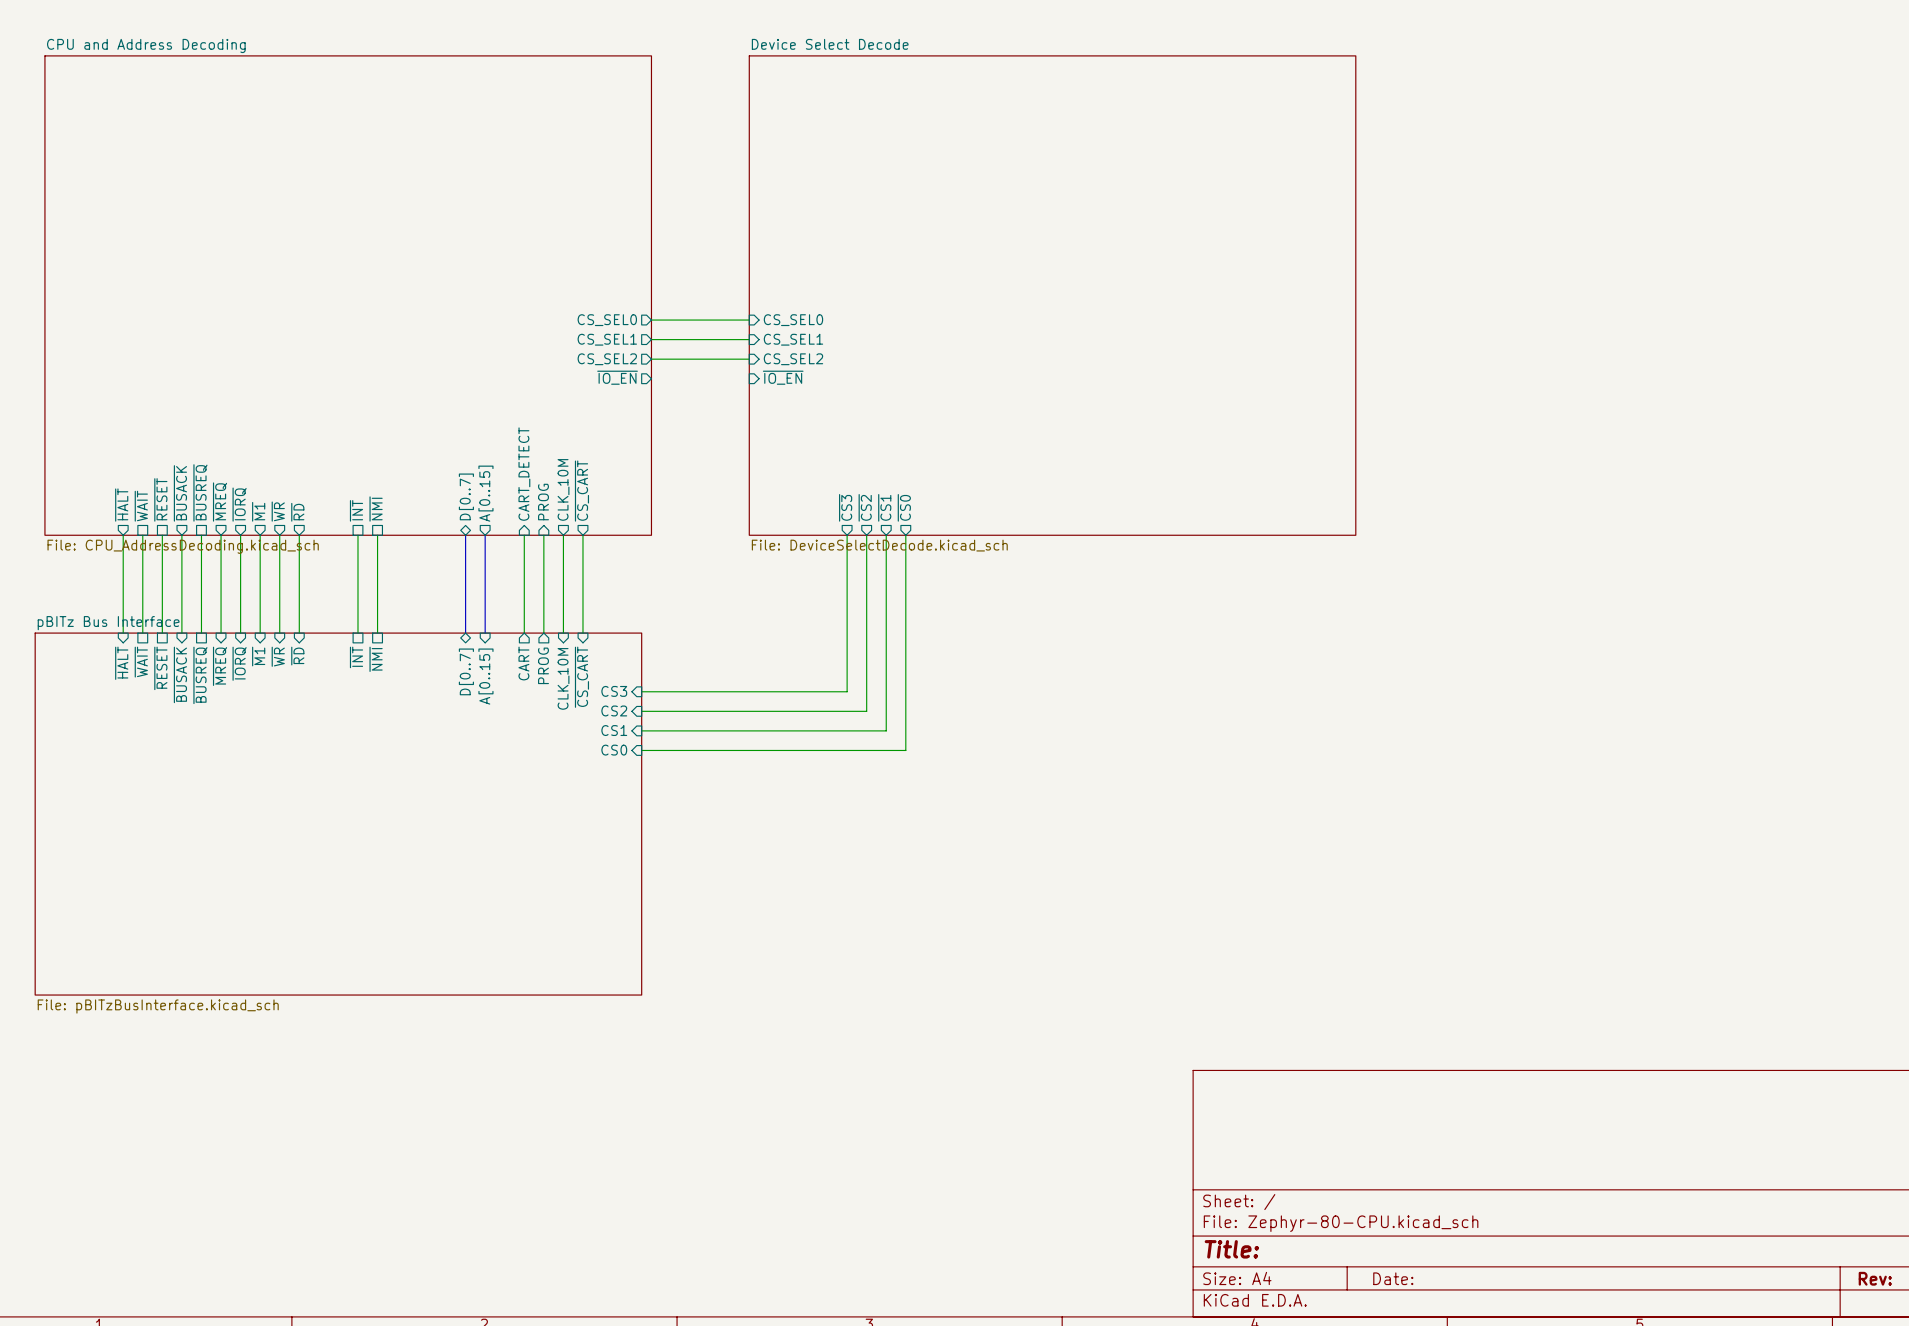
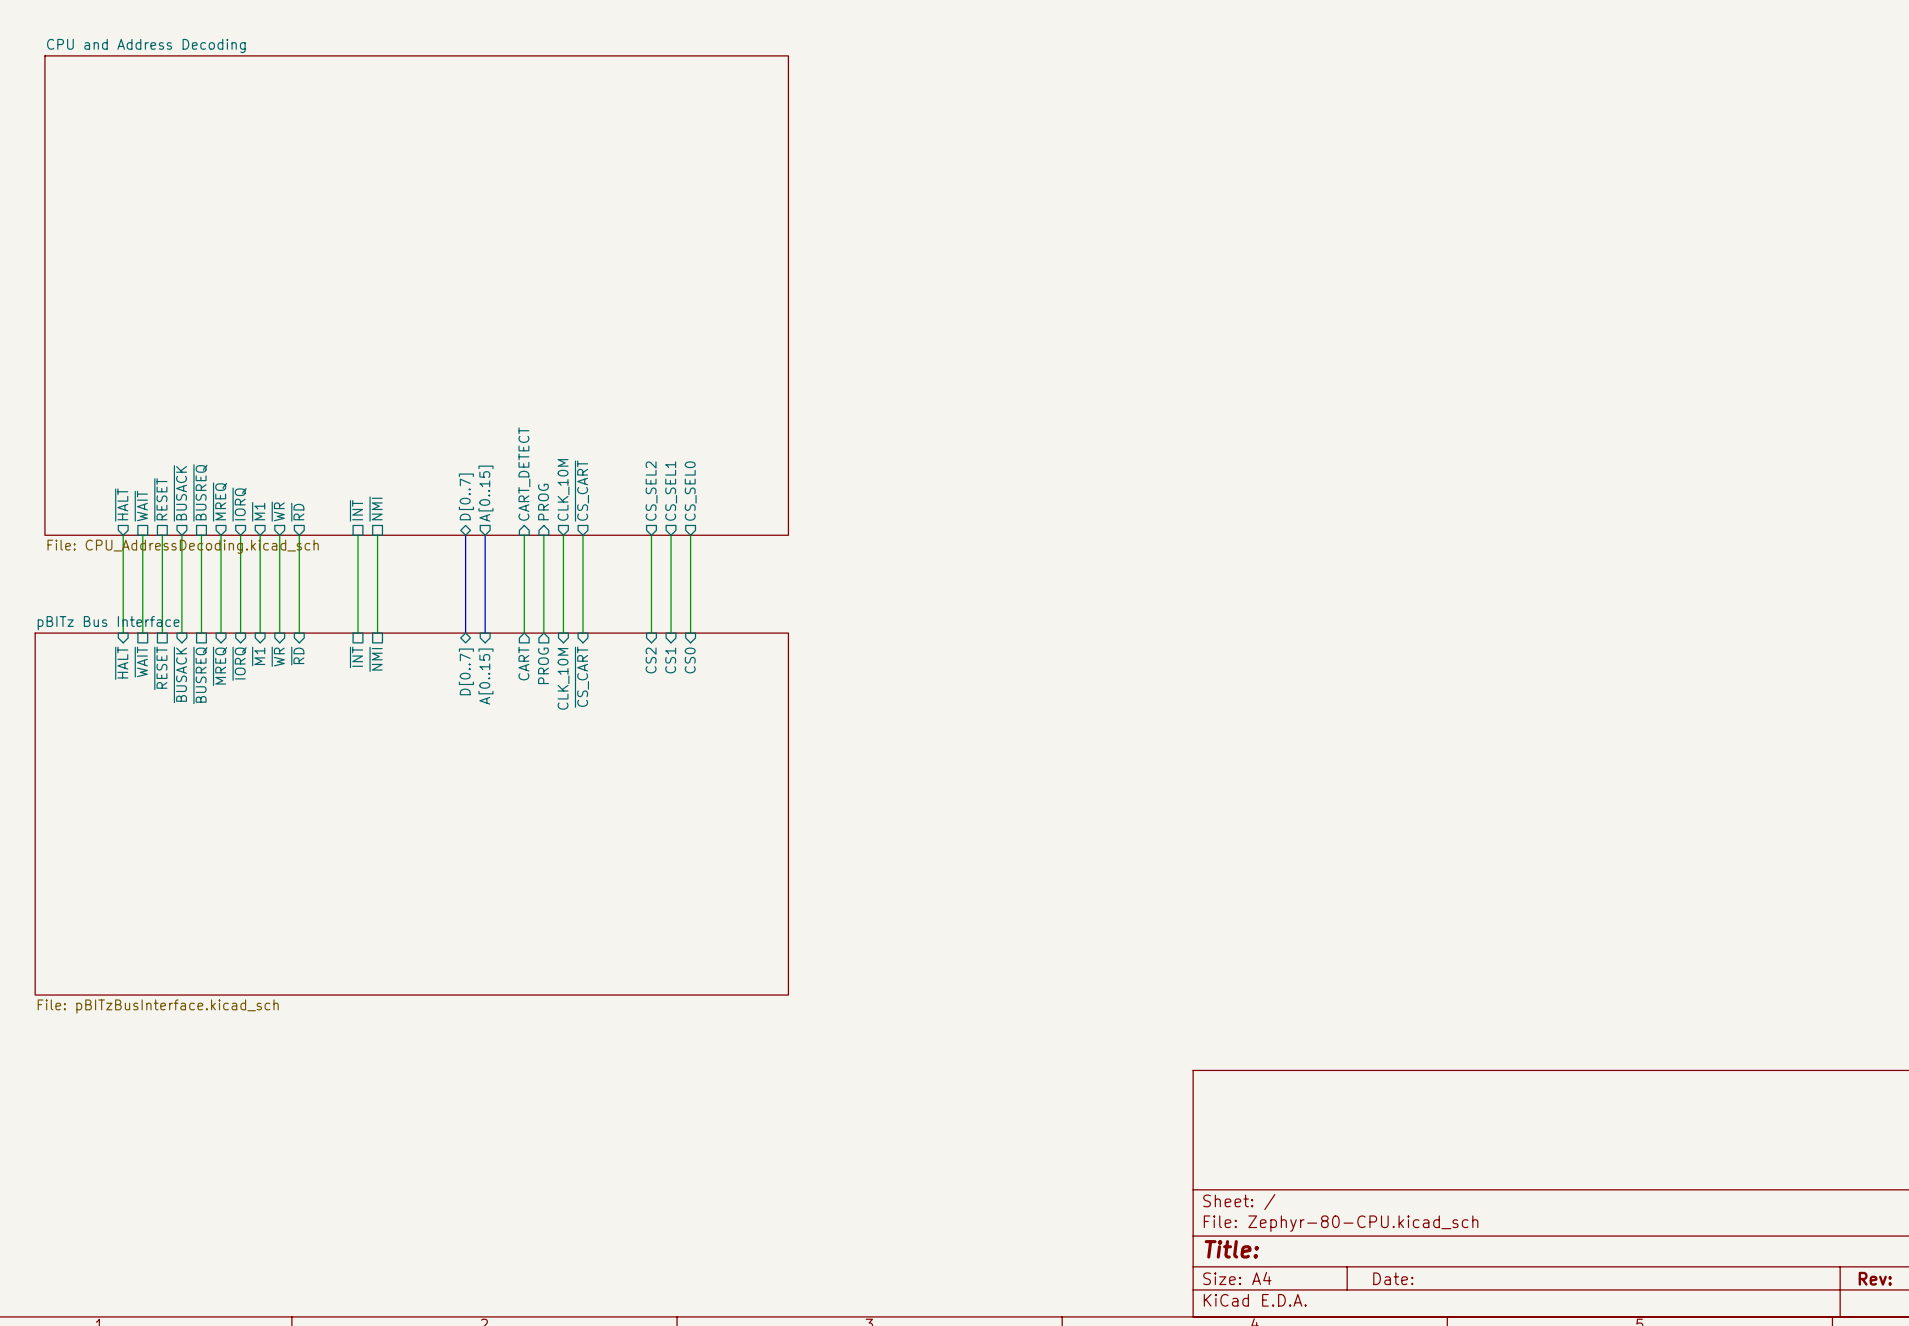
sheet CPU and Address Decoding: File: CPU_AddressDecoding.kicad_sch (348, 295) -> none
sheet CPU and Address Decoding: none -> File: CPU_AddressDecoding.kicad_sch (416, 295)
sheet Device Select Decode: File: DeviceSelectDecode.kicad_sch (1052, 295) -> none
sheet pin: CS_SEL0 (607, 320) -> none
wire: (651, 320) (749, 320) -> none
sheet pin: CS_SEL0 (793, 320) -> none
sheet pin: CS_SEL1 (607, 339) -> none
wire: (651, 339) (749, 339) -> none
sheet pin: CS_SEL1 (793, 339) -> none
sheet pin: CS_SEL2 (607, 359) -> none
wire: (651, 359) (749, 359) -> none
sheet pin: CS_SEL2 (793, 359) -> none
sheet pin: ~{IO_EN} (617, 377) -> none
sheet pin: ~{IO_EN} (783, 377) -> none
sheet pin: none -> CS_SEL2 (651, 491)
sheet pin: none -> CS_SEL1 (671, 491)
sheet pin: none -> CS_SEL0 (690, 491)
sheet pin: ~{CS3} (845, 507) -> none
sheet pin: ~{CS2} (865, 507) -> none
sheet pin: ~{CS1} (884, 507) -> none
sheet pin: ~{CS0} (904, 507) -> none
wire: none -> (651, 535) (651, 633)
wire: none -> (671, 535) (671, 633)
wire: none -> (690, 535) (690, 633)
wire: (847, 535) (847, 691) (641, 691) -> none
wire: (866, 535) (866, 711) (641, 711) -> none
wire: (886, 535) (886, 730) (641, 730) -> none
wire: (905, 535) (905, 750) (641, 750) -> none
sheet pin: CS3 (614, 691) -> none
sheet pin rotation: 0° (614, 710) -> 90° counterclockwise (651, 660)
sheet pin position: CS2 (614, 710) -> CS2 (651, 660)
sheet pin rotation: 0° (614, 730) -> 90° counterclockwise (670, 660)
sheet pin position: CS1 (614, 730) -> CS1 (670, 660)
sheet pin rotation: 0° (614, 750) -> 90° counterclockwise (690, 660)
sheet pin position: CS0 (614, 750) -> CS0 (690, 660)
sheet pBITz Bus Interface: File: pBITzBusInterface.kicad_sch (338, 814) -> none
sheet pBITz Bus Interface: none -> File: pBITzBusInterface.kicad_sch (411, 814)

